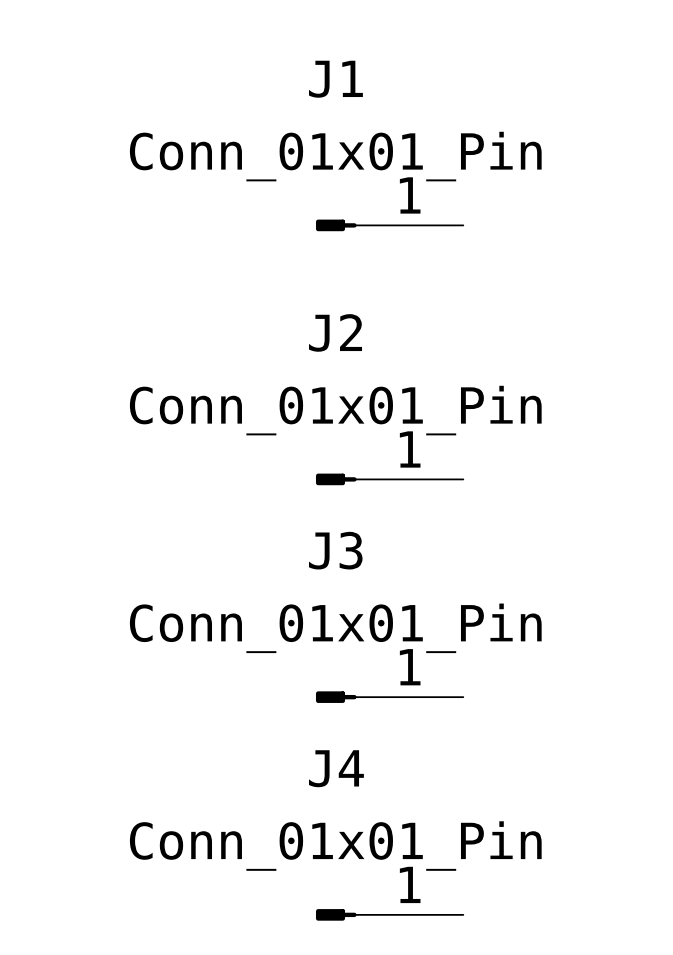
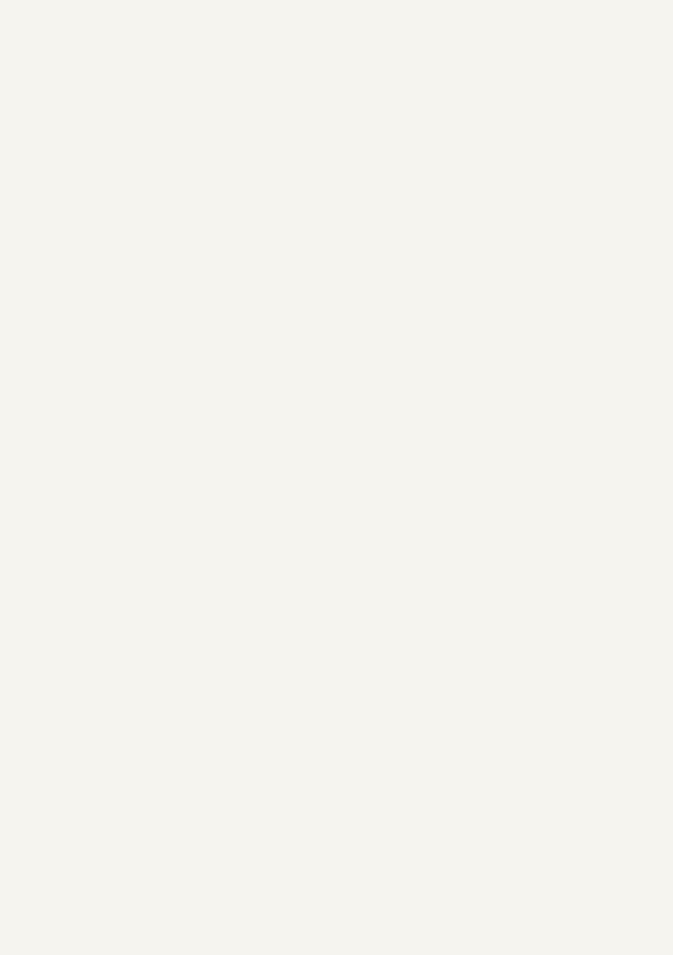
J1: Conn_01x01_Pin (389, 225) -> none
J2: Conn_01x01_Pin (389, 479) -> none
J3: Conn_01x01_Pin (389, 697) -> none
J4: Conn_01x01_Pin (389, 914) -> none

